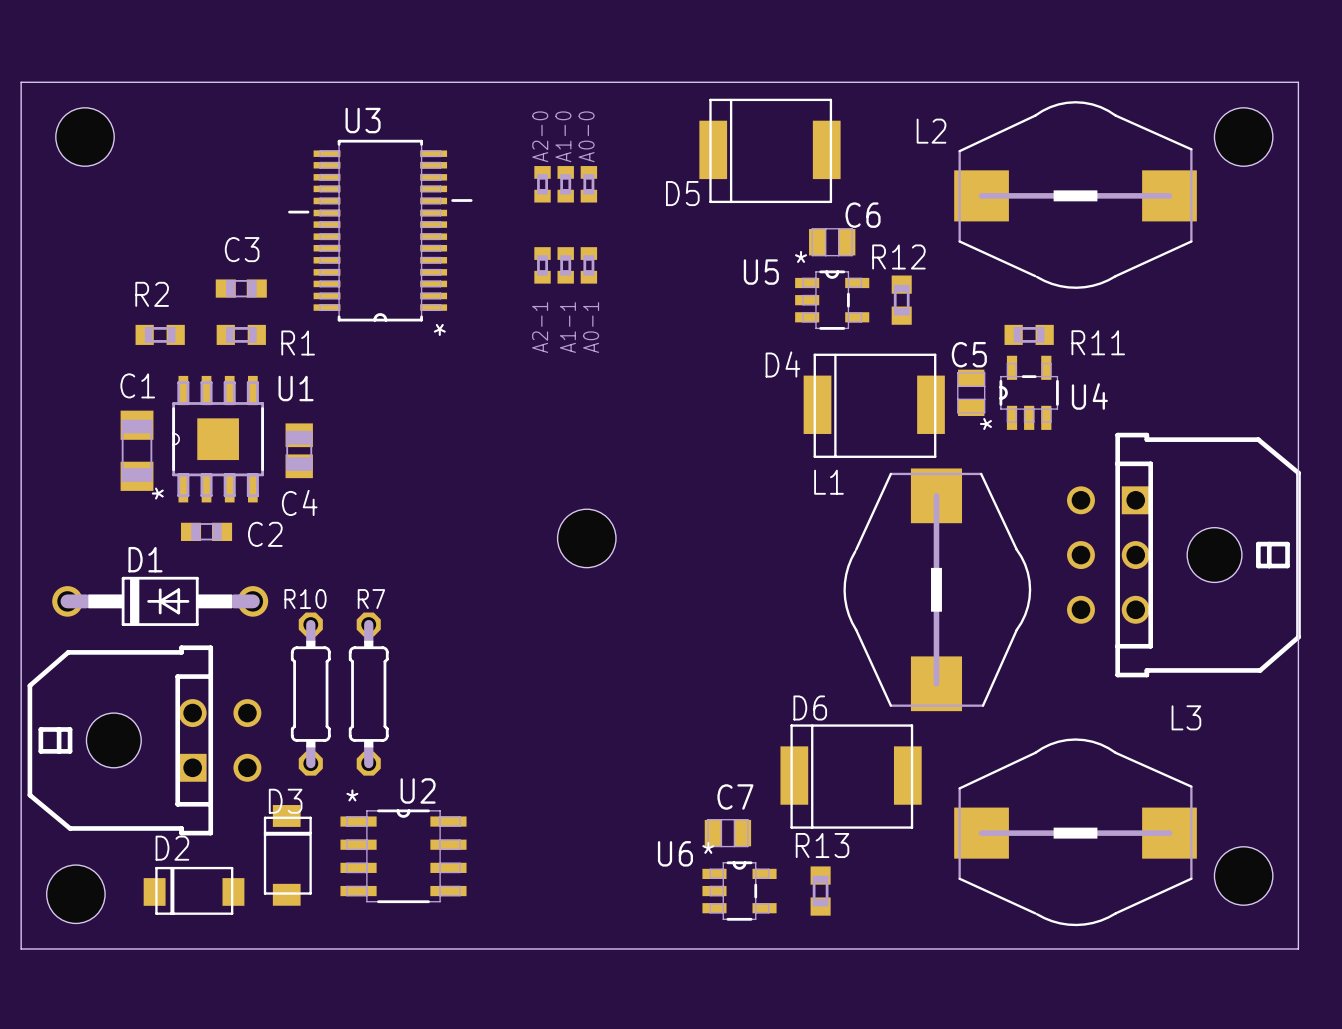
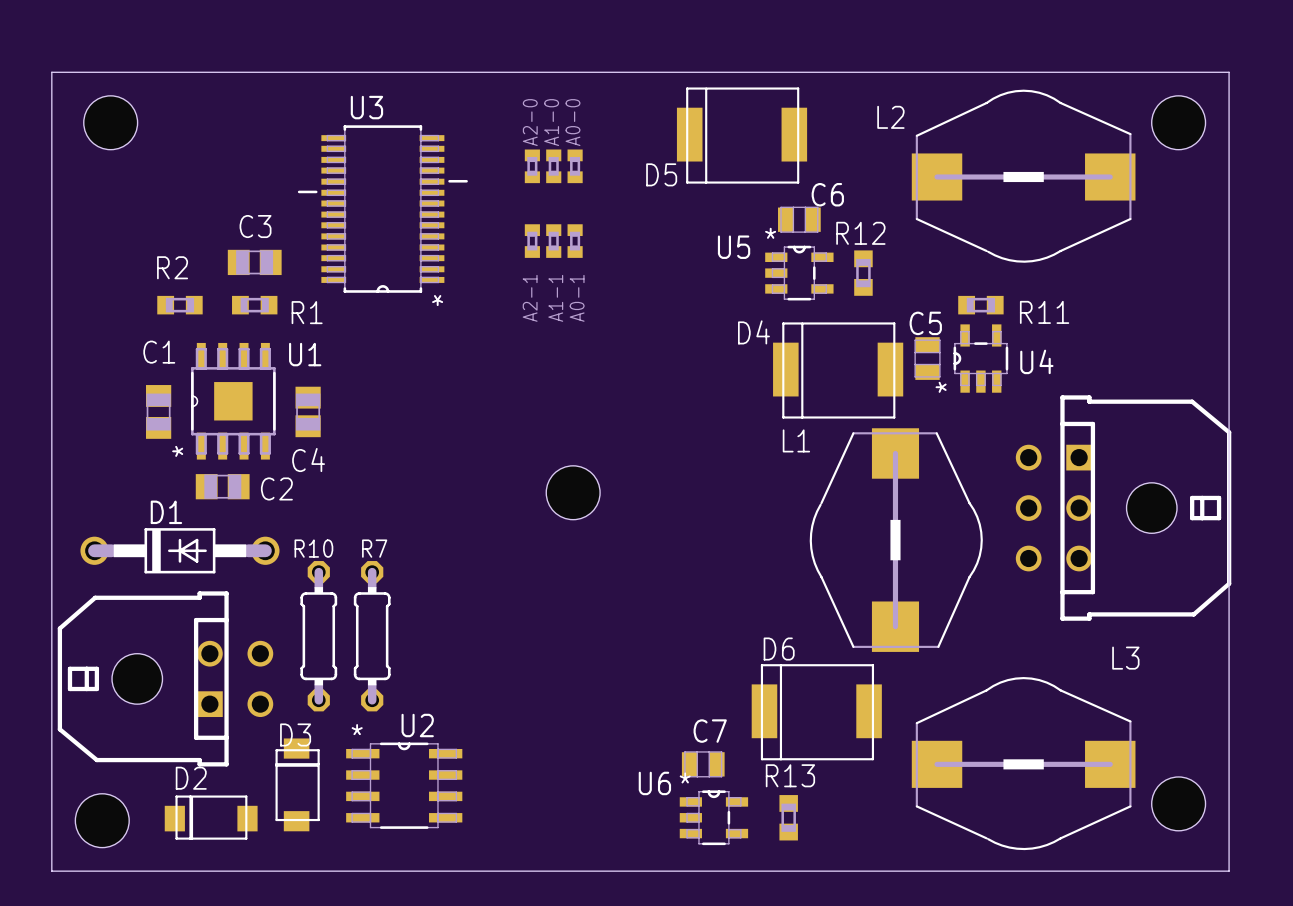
C3 footprint: [215, 279, 267, 298] -> [227, 249, 282, 276]
C1 footprint: [120, 410, 154, 491] -> [146, 385, 172, 439]
C2 footprint: [180, 522, 233, 542] -> [195, 474, 250, 500]

